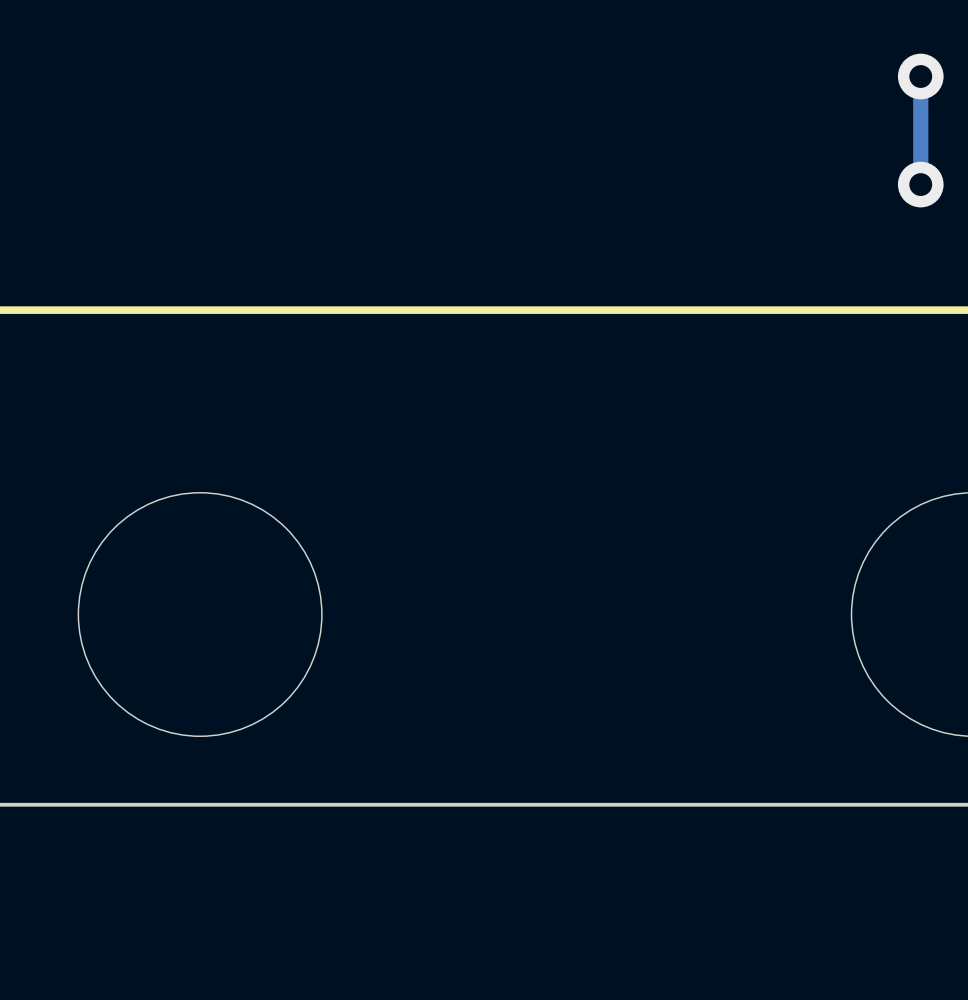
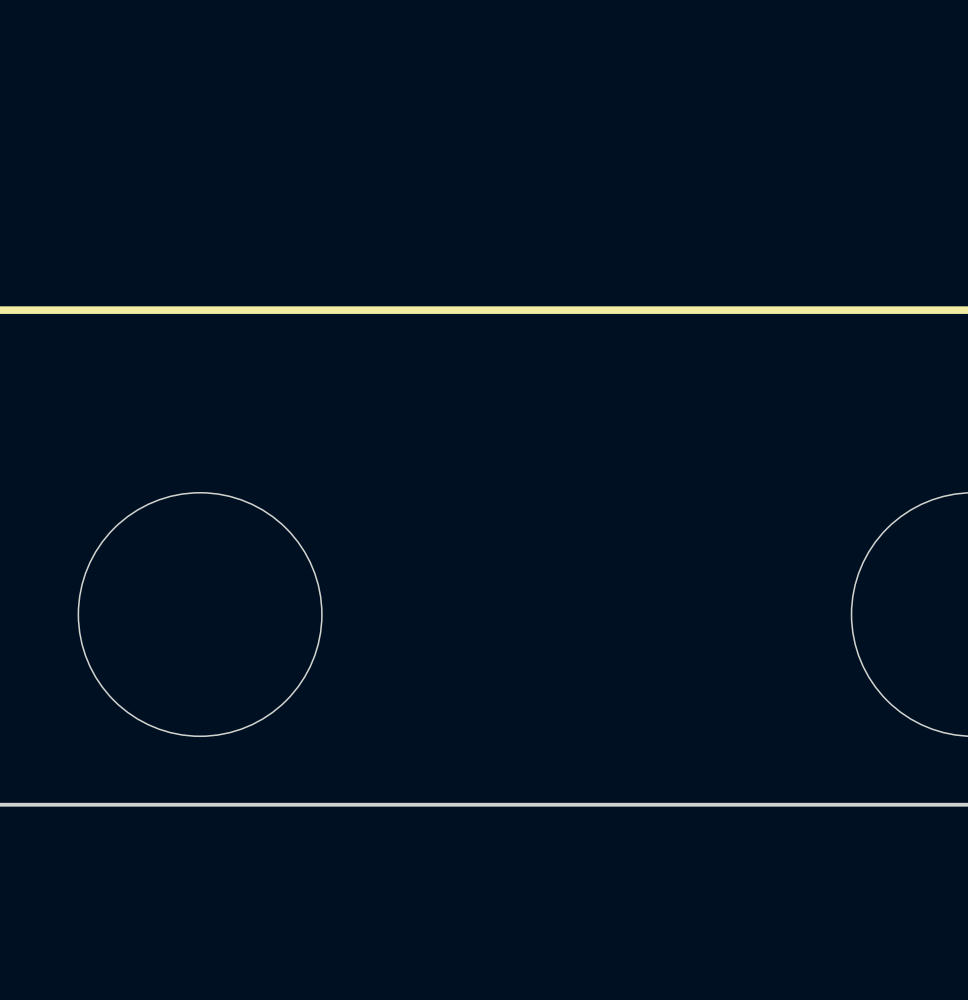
track: (920, 76) (920, 184) -> none
via: (920, 76) -> none
via: (920, 184) -> none

